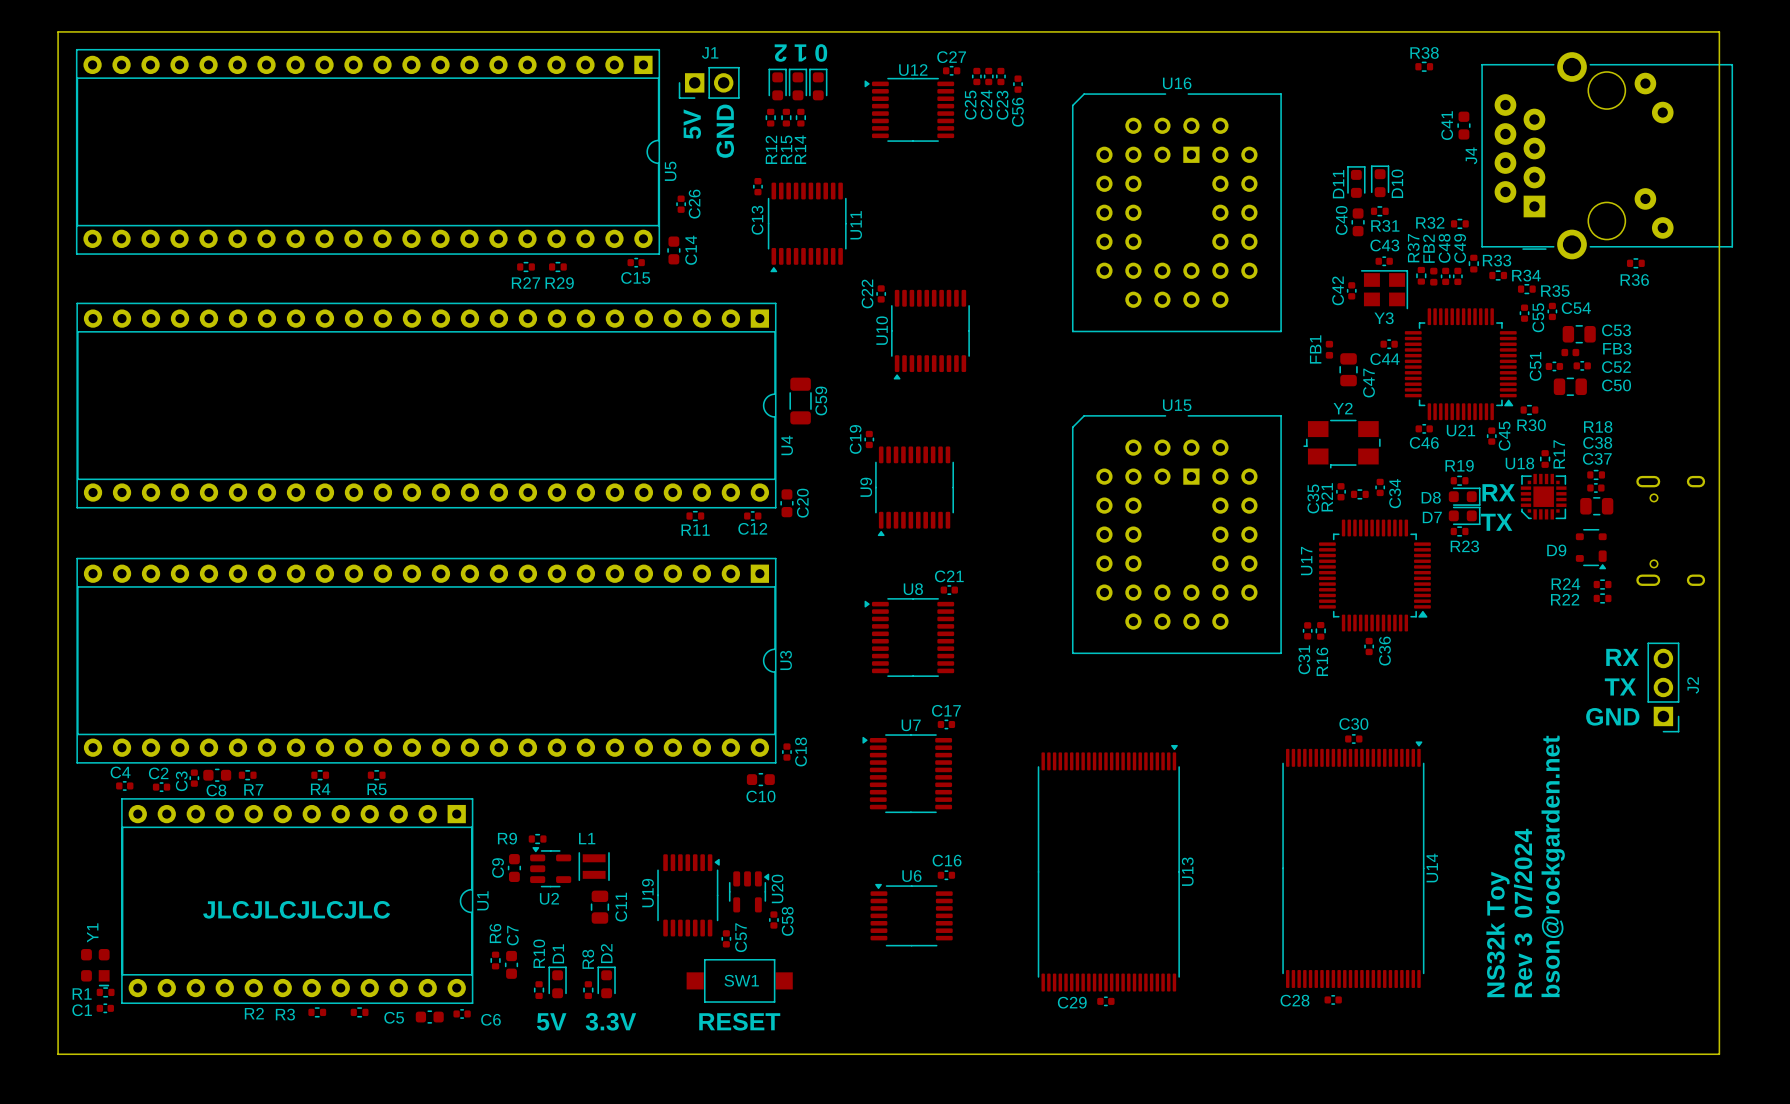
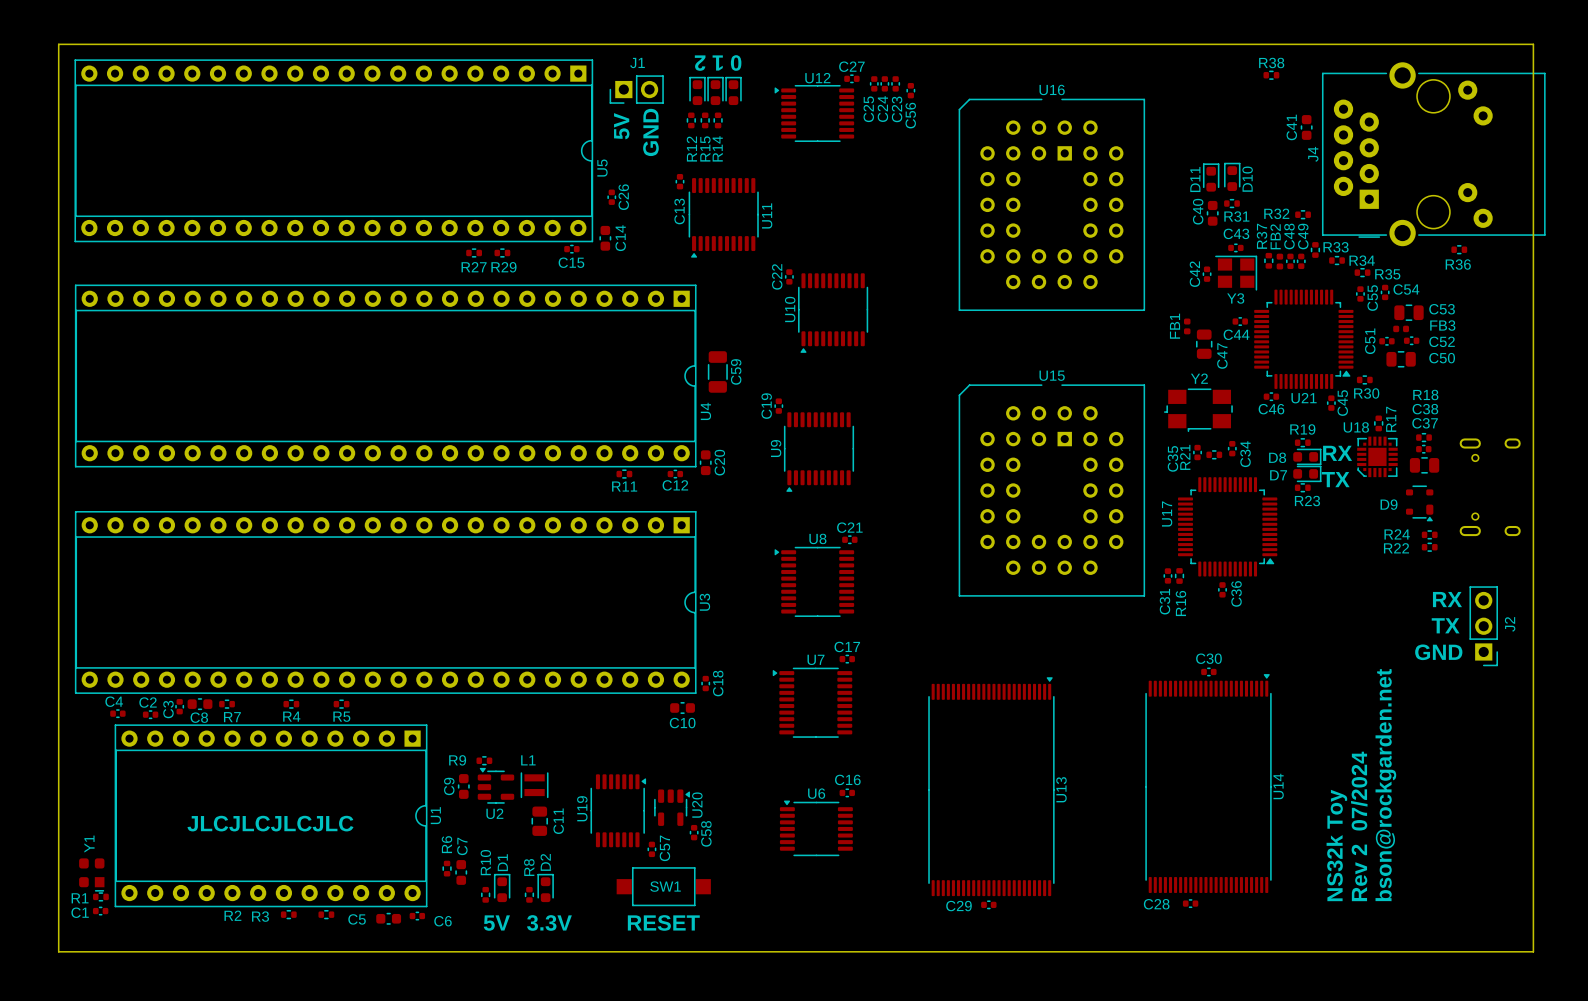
text: Rev 3 07/2024 (1523, 913) -> Rev 2 07/2024 (1359, 826)

